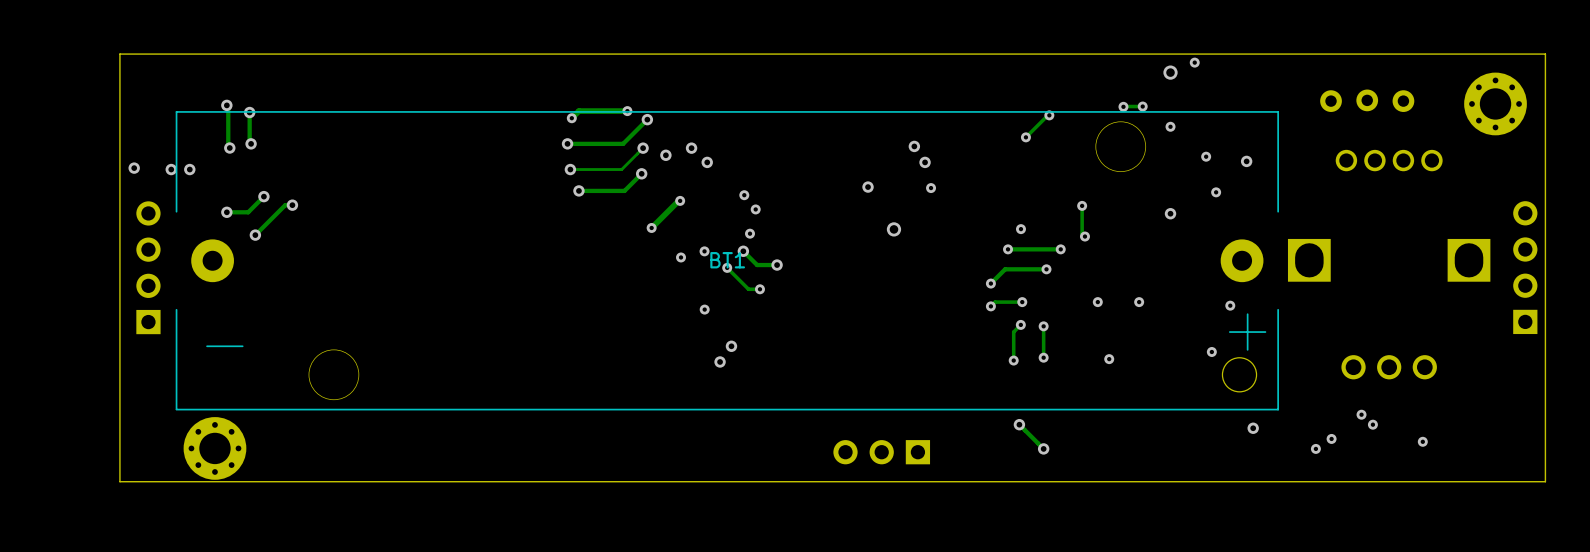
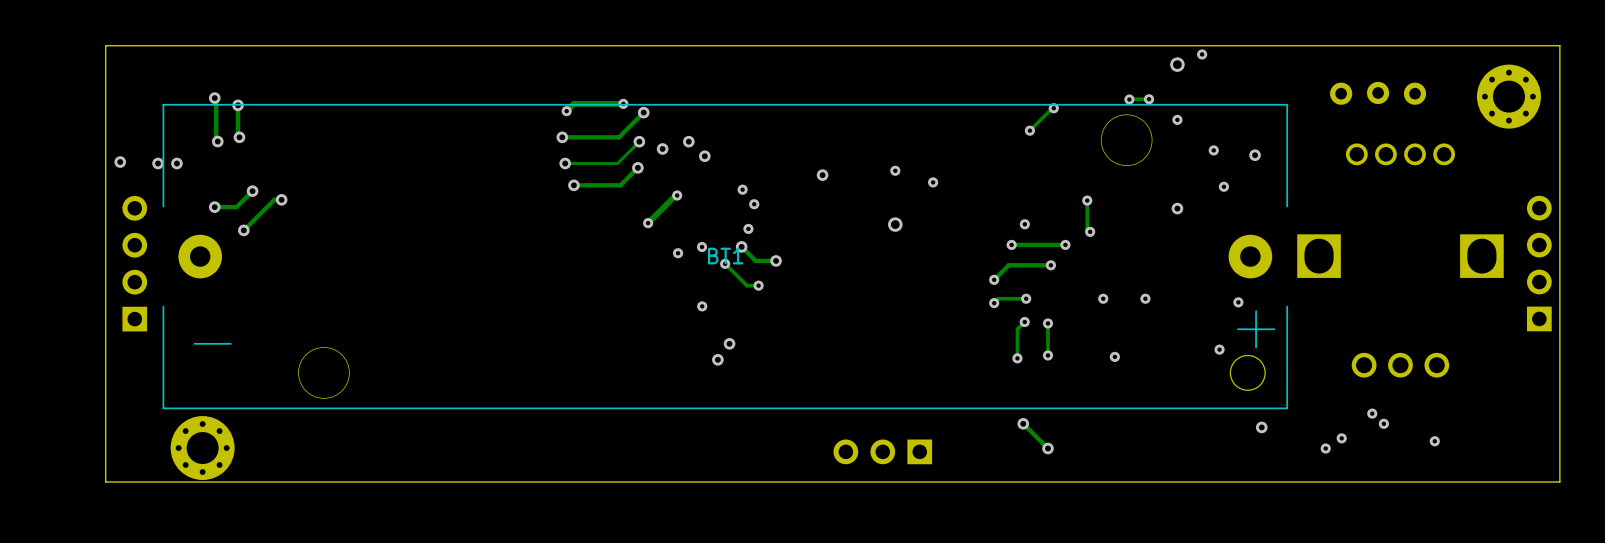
via: (914, 146) -> none
via: (925, 162) -> none
via: none -> (895, 170)
via position: (868, 187) -> (822, 175)

